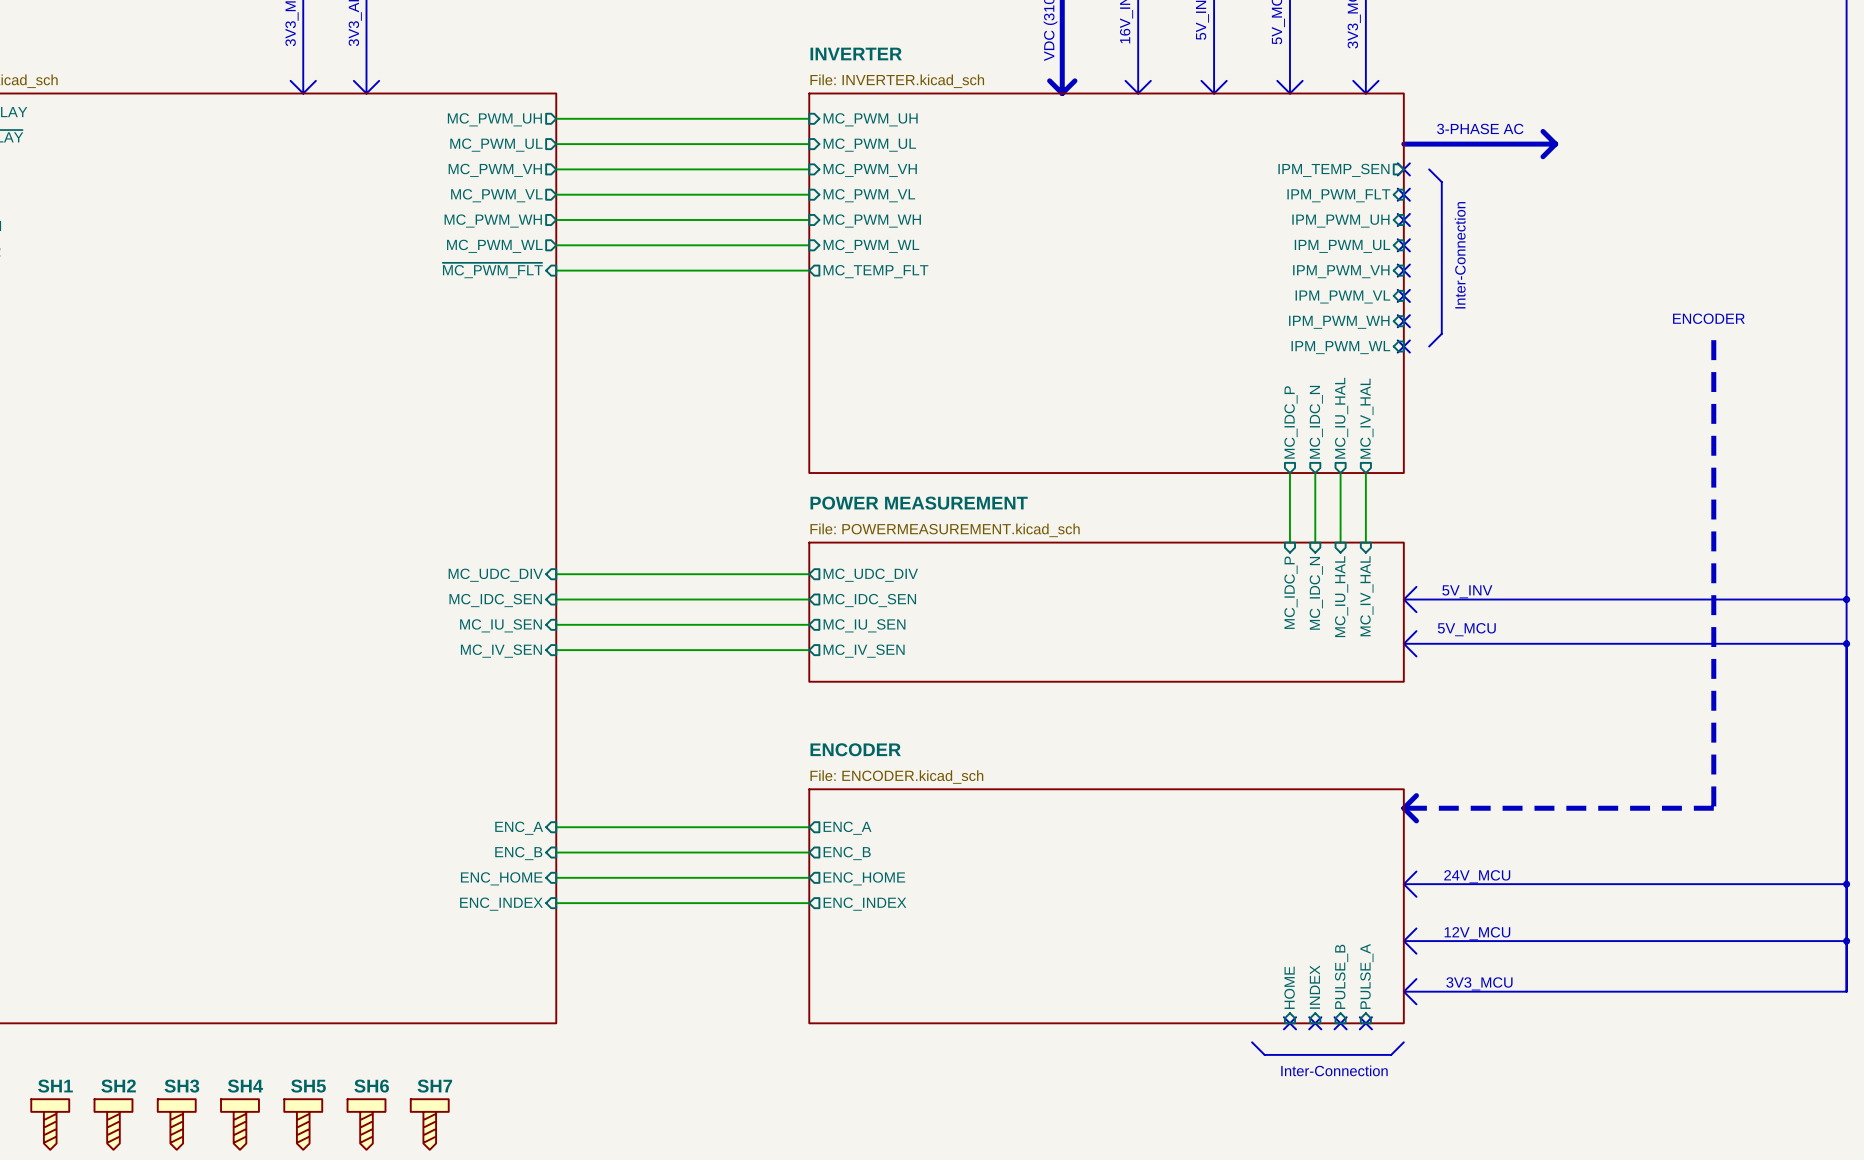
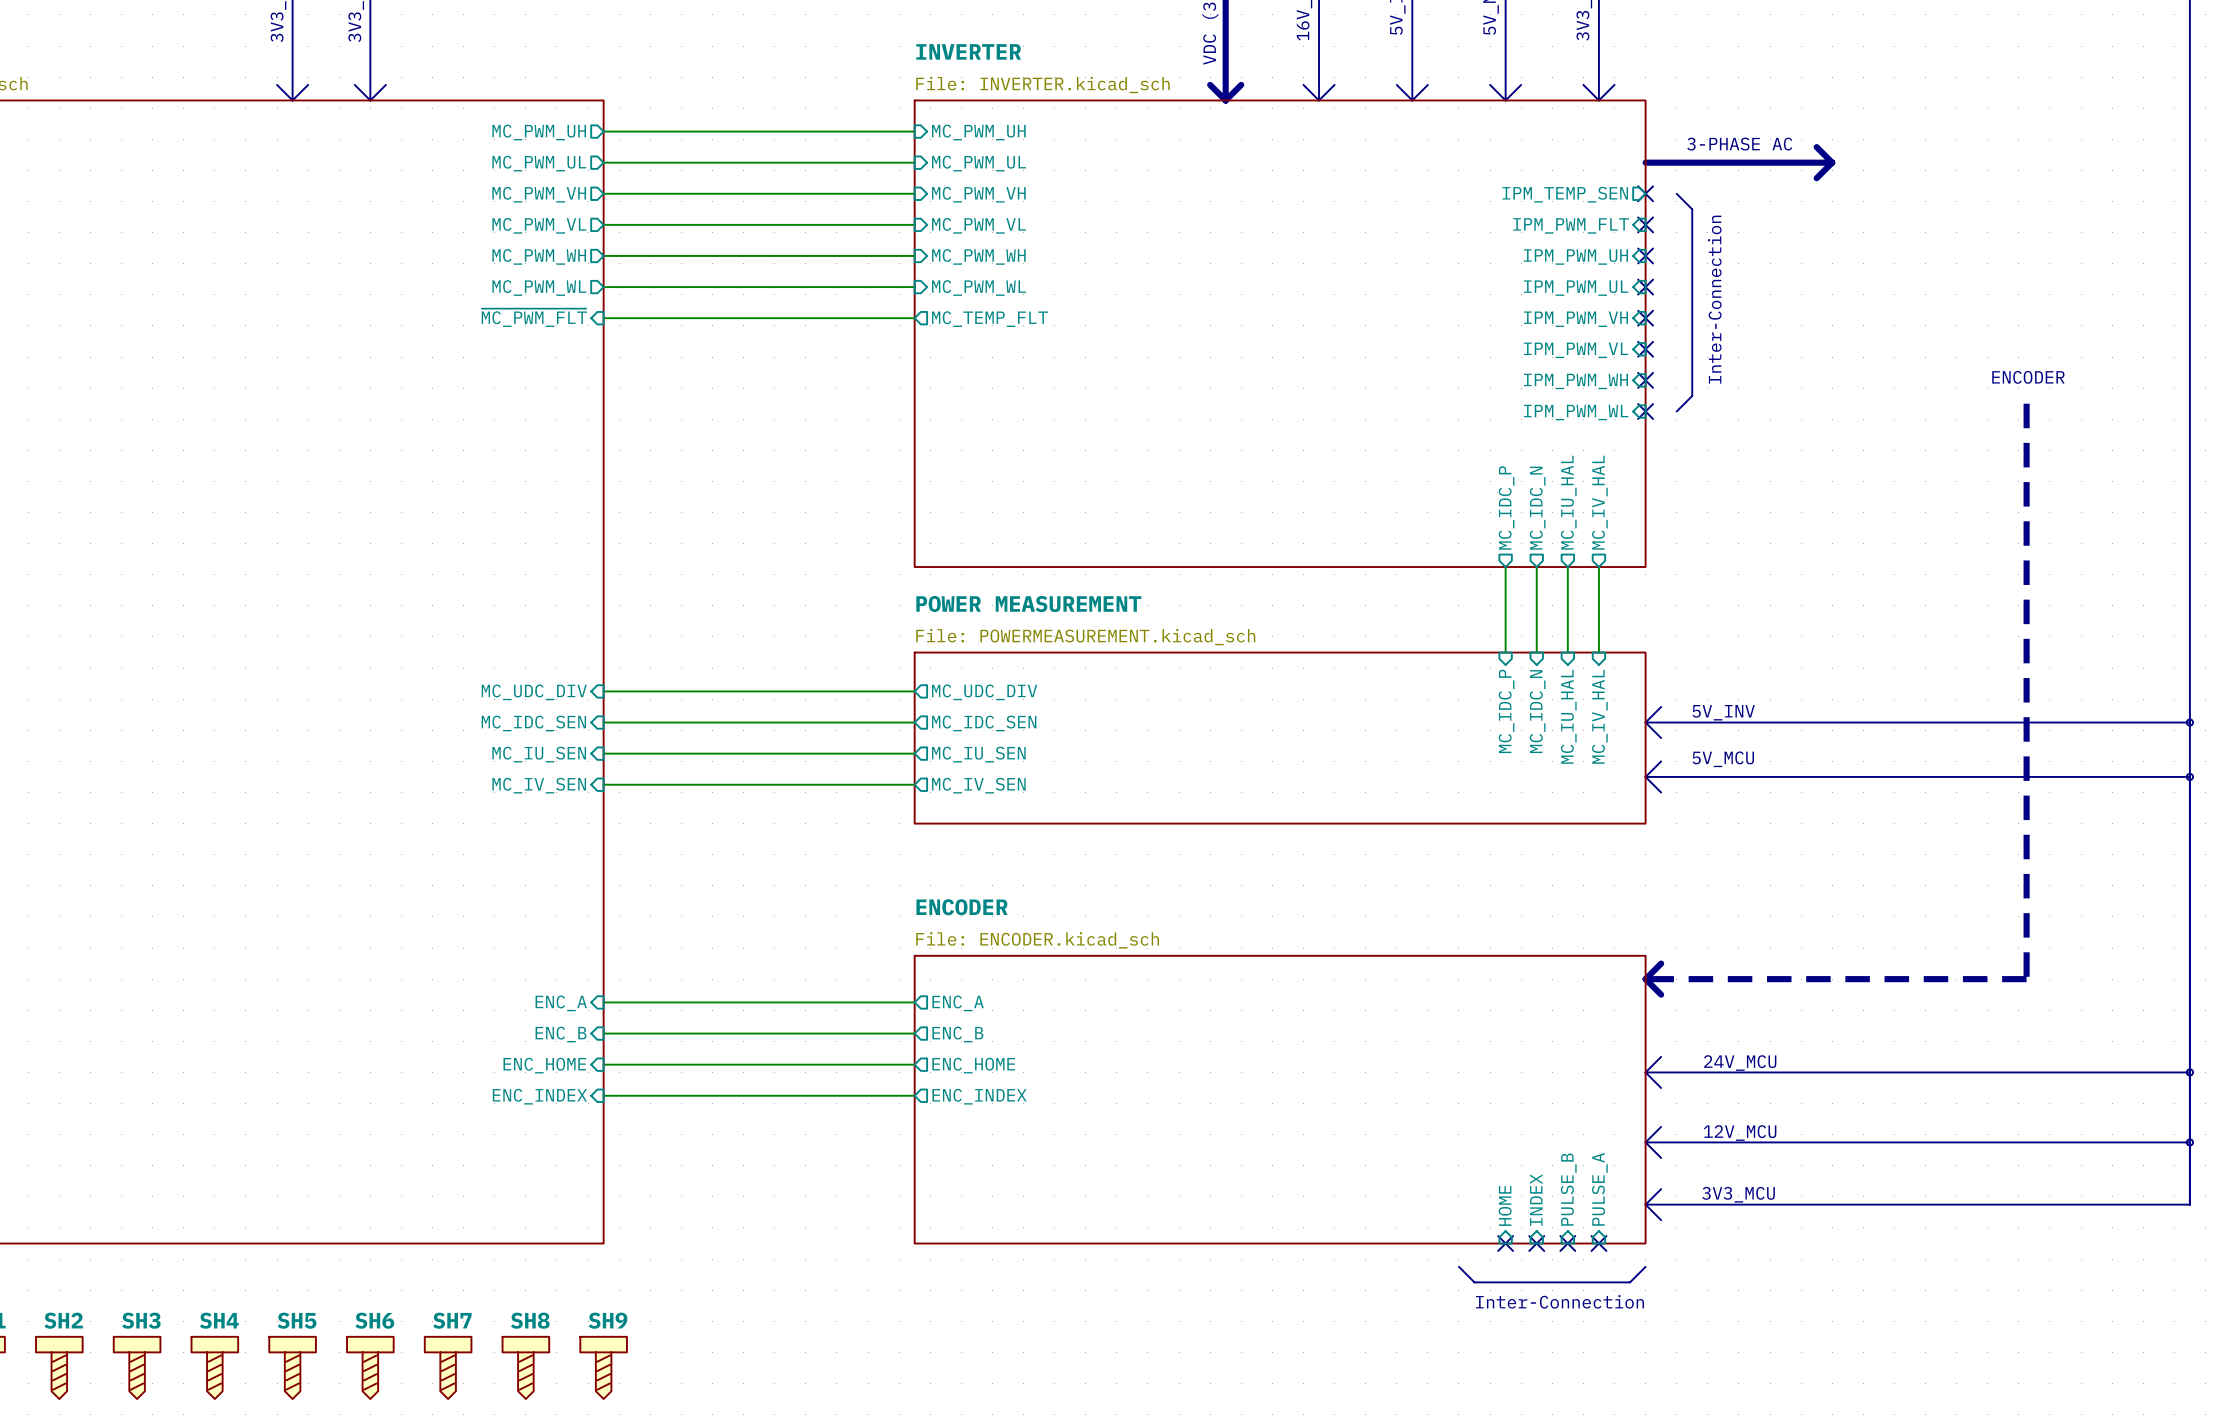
SH8: none -> (525, 1367)
SH9: none -> (603, 1367)

